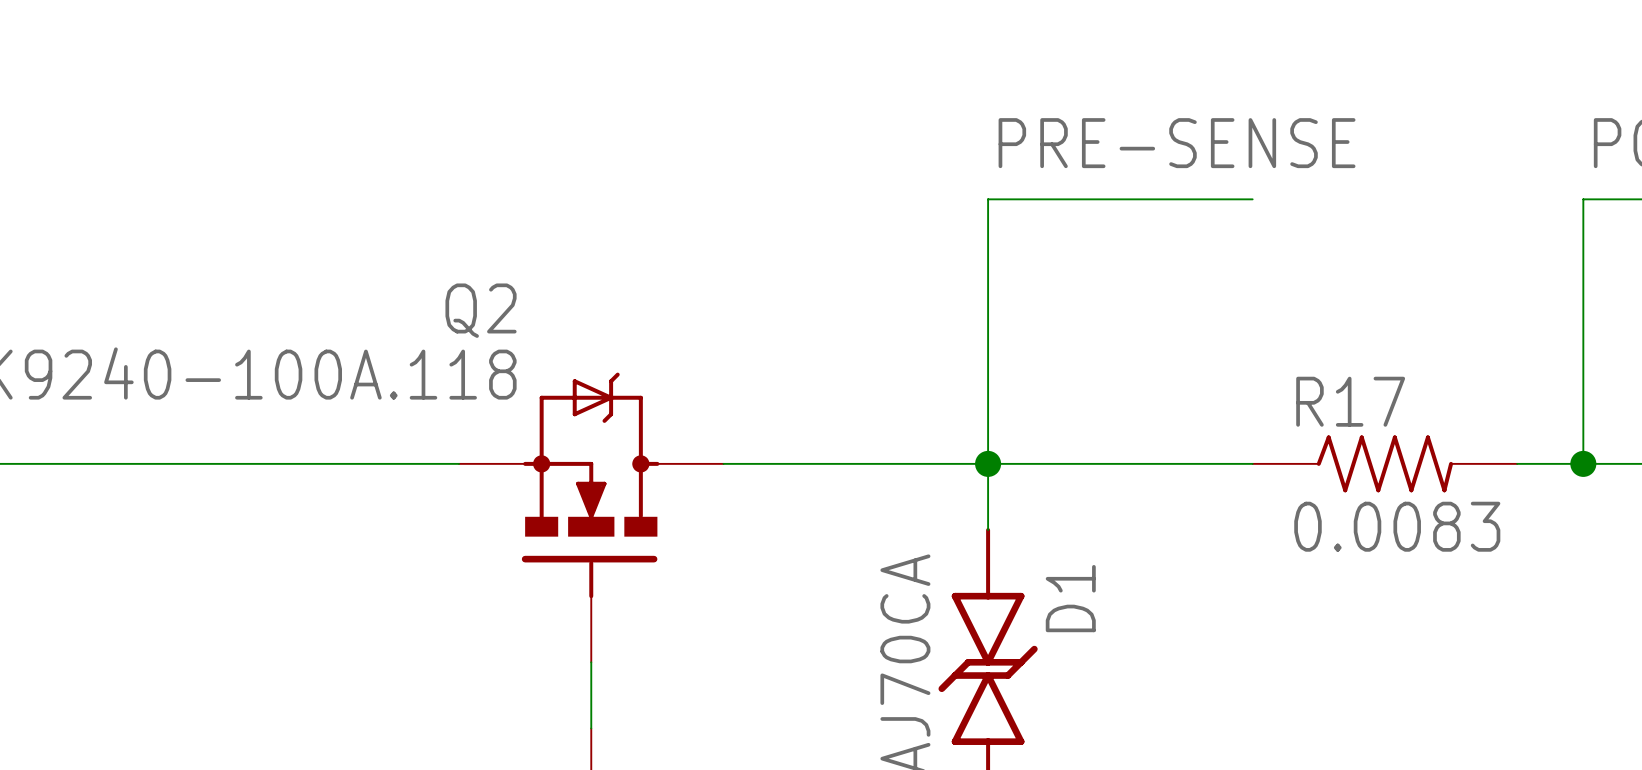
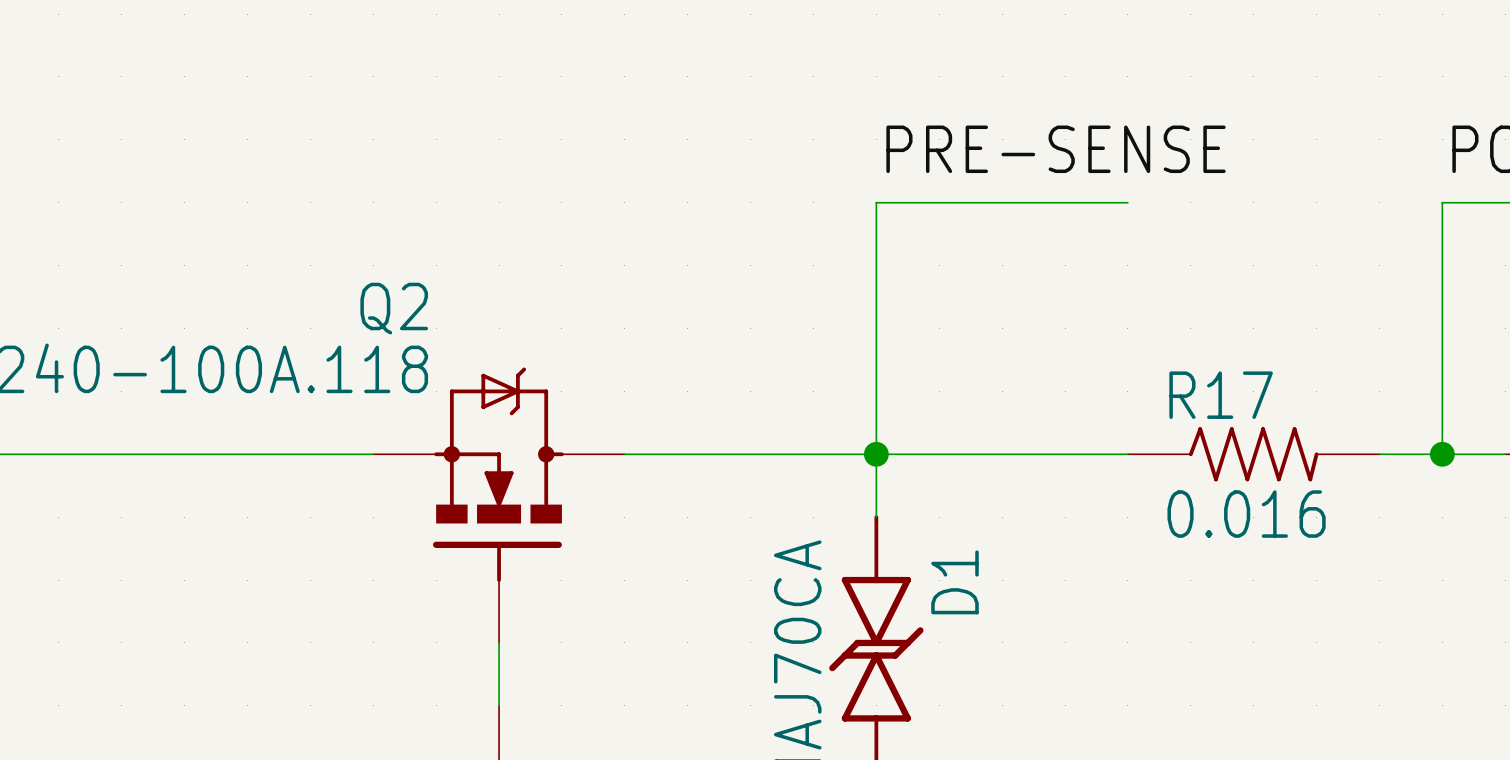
R17 value: 0.0083 (1397, 526) -> 0.016 (1246, 514)

